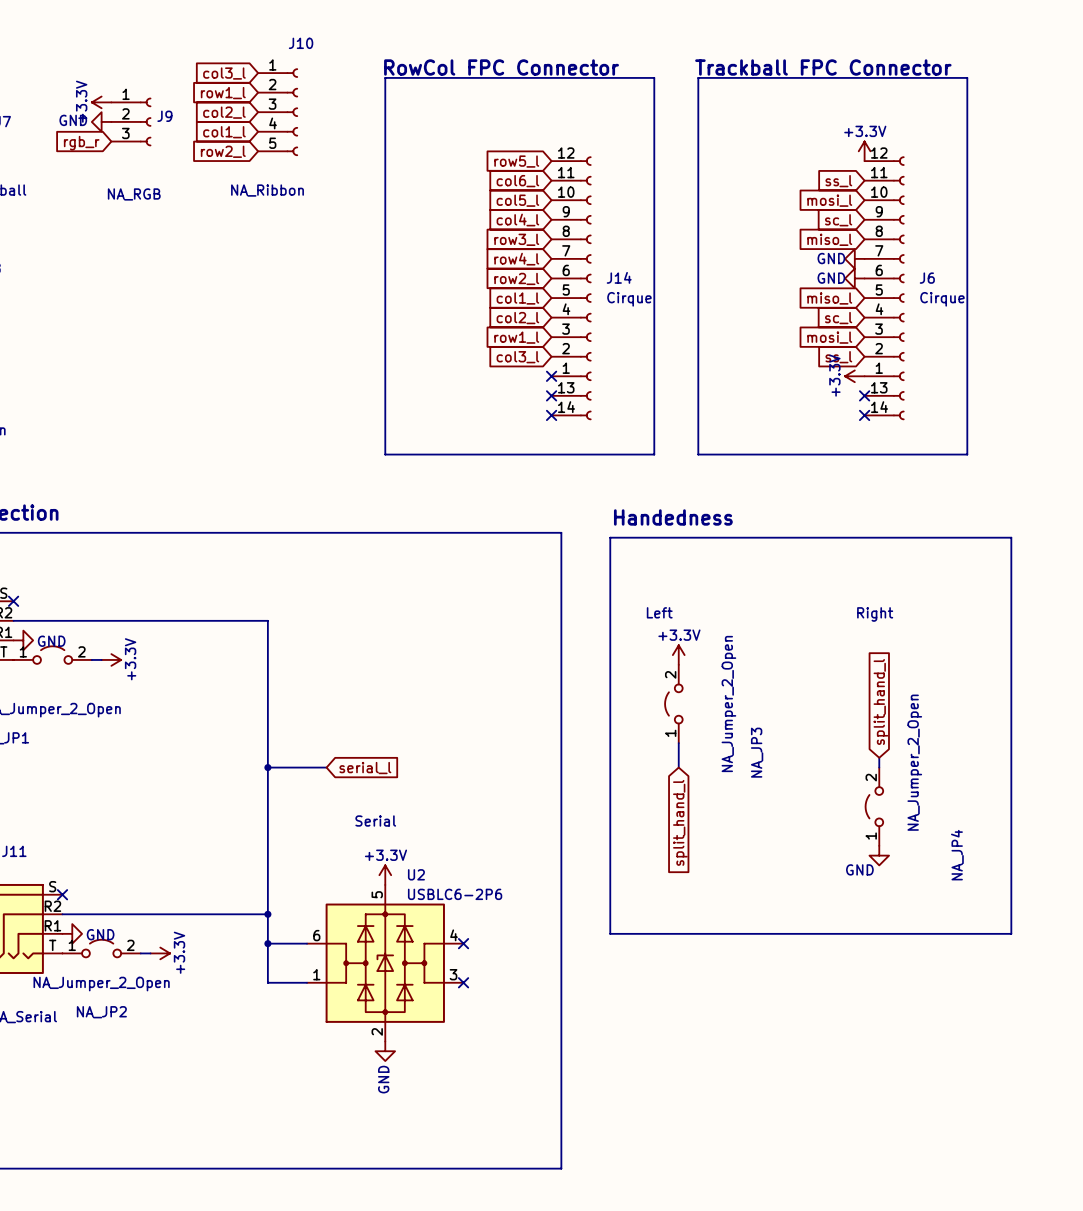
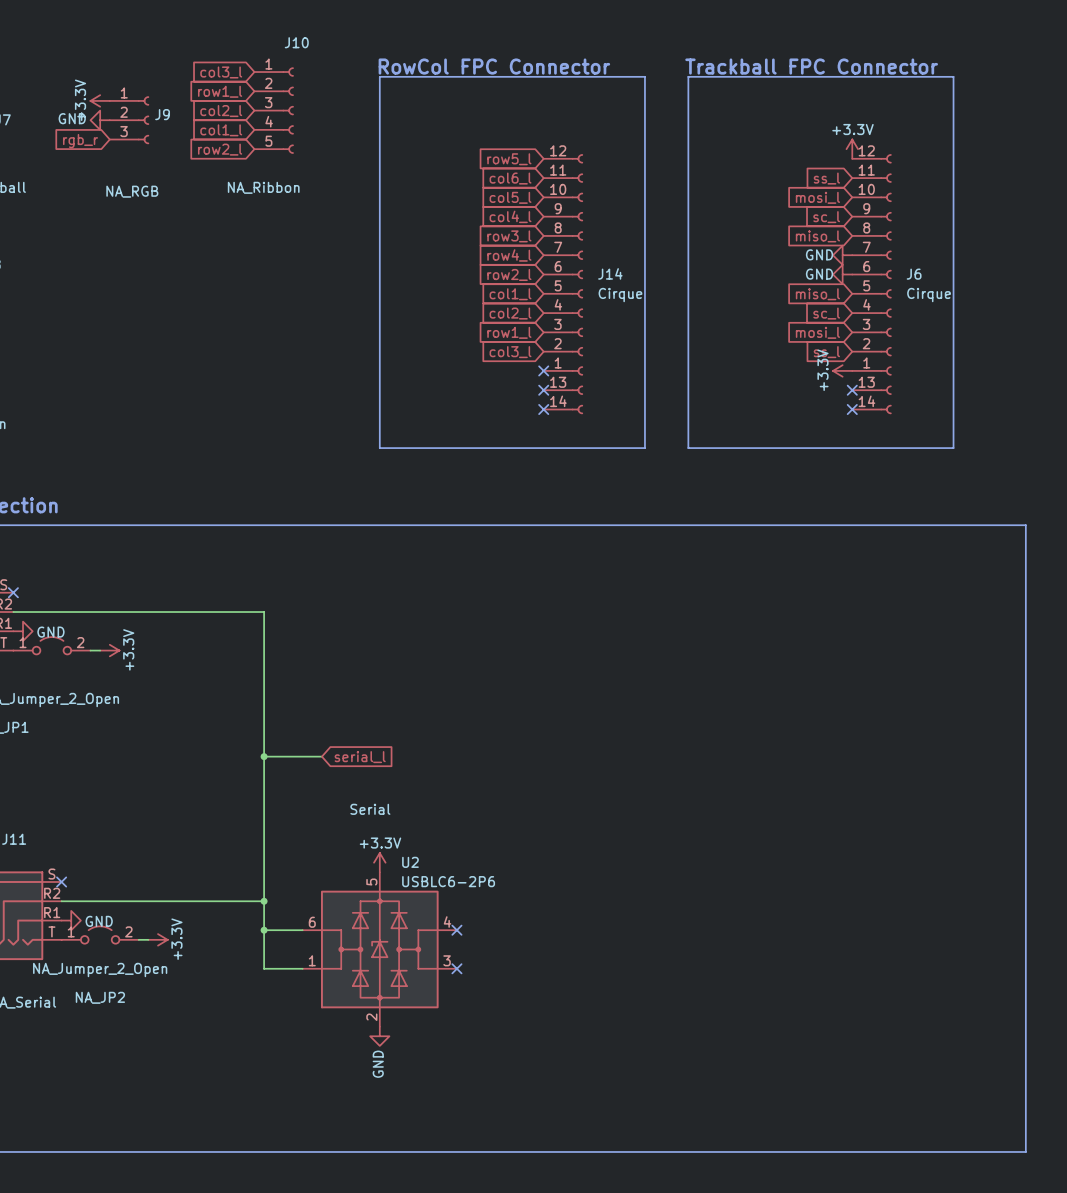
text: Handedness (673, 517) -> none
line: (561, 532) (561, 1168) -> (553, 525) (1025, 525) (1025, 1151) (553, 1151)
line: (610, 537) (1011, 537) (1011, 933) (610, 933) (610, 537) -> none
text: Left (659, 612) -> none
text: Right (875, 614) -> none
power symbol: +3.3V (678, 655) -> none
global label: split_hand_l (880, 701) -> none
NA_JP3: NA_Jumper_2_Open (673, 703) -> none
wire: (678, 743) (678, 767) -> none
wire: (879, 757) (879, 767) -> none
NA_JP4: NA_Jumper_2_Open (874, 806) -> none
global label: split_hand_l (680, 822) -> none
power symbol: GND (879, 855) -> none

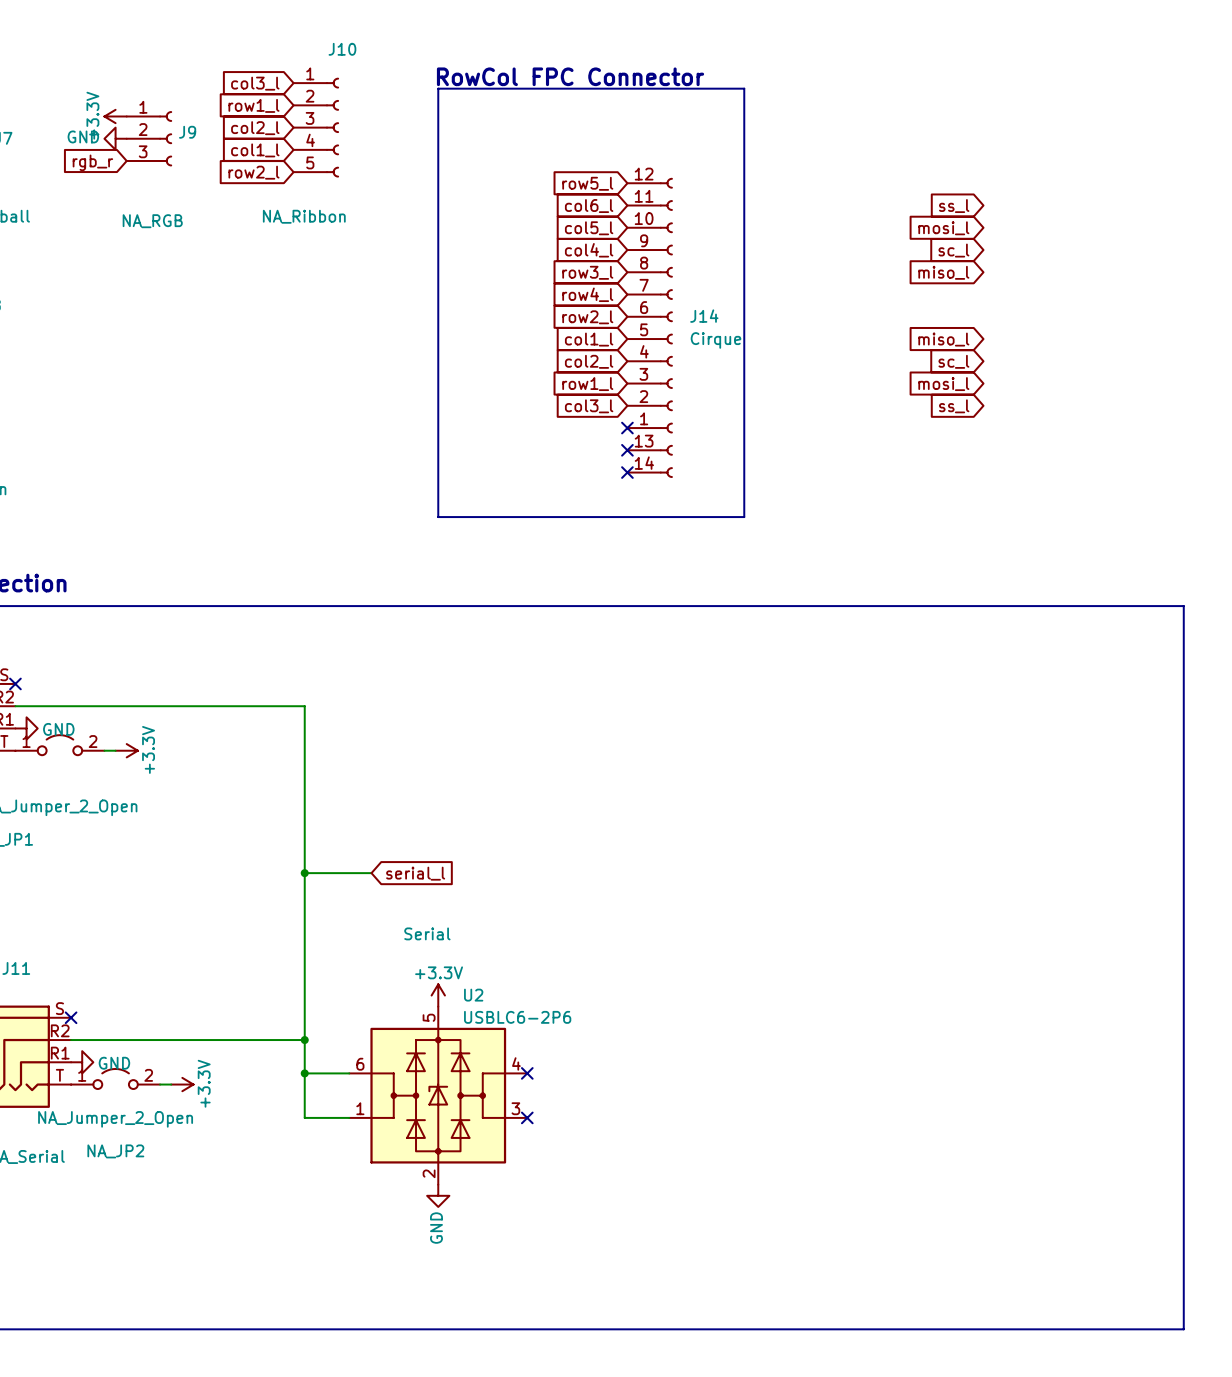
text: Trackball FPC Connector (811, 66) -> none
line: (688, 76) (688, 448) (953, 448) (953, 76) (688, 76) -> none
power symbol: +3.3V (852, 149) -> none
power symbol: GND (842, 255) -> none
power symbol: GND (842, 274) -> none
J6: Cirque (871, 284) -> none
power symbol: +3.3V (842, 370) -> none
no-connect mark: (852, 390) -> none
no-connect mark: (852, 409) -> none

